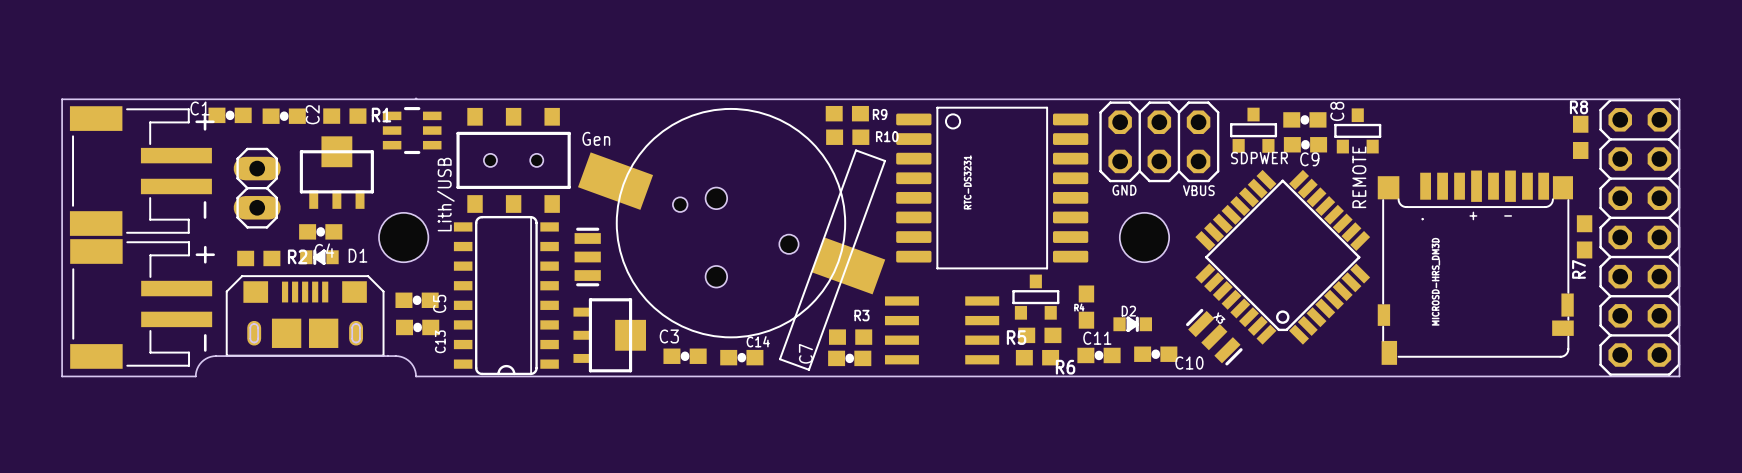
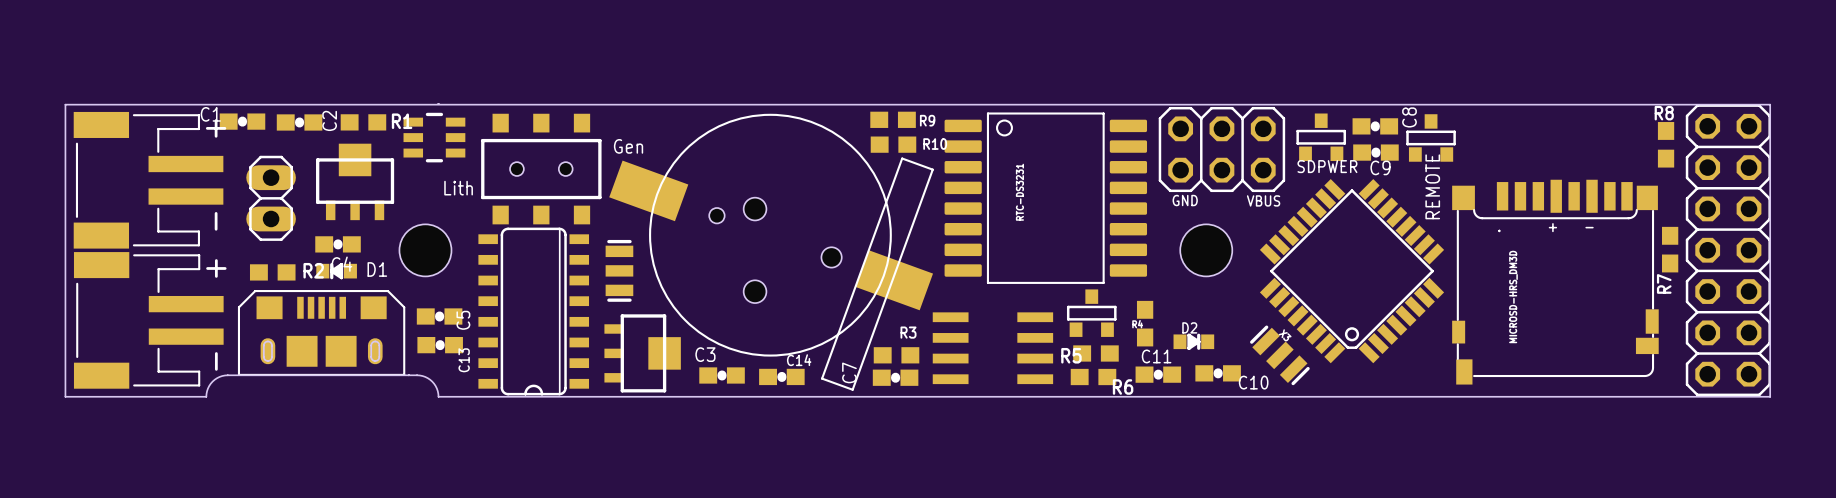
text: Lith/USB (445, 194) -> Lith (458, 188)

